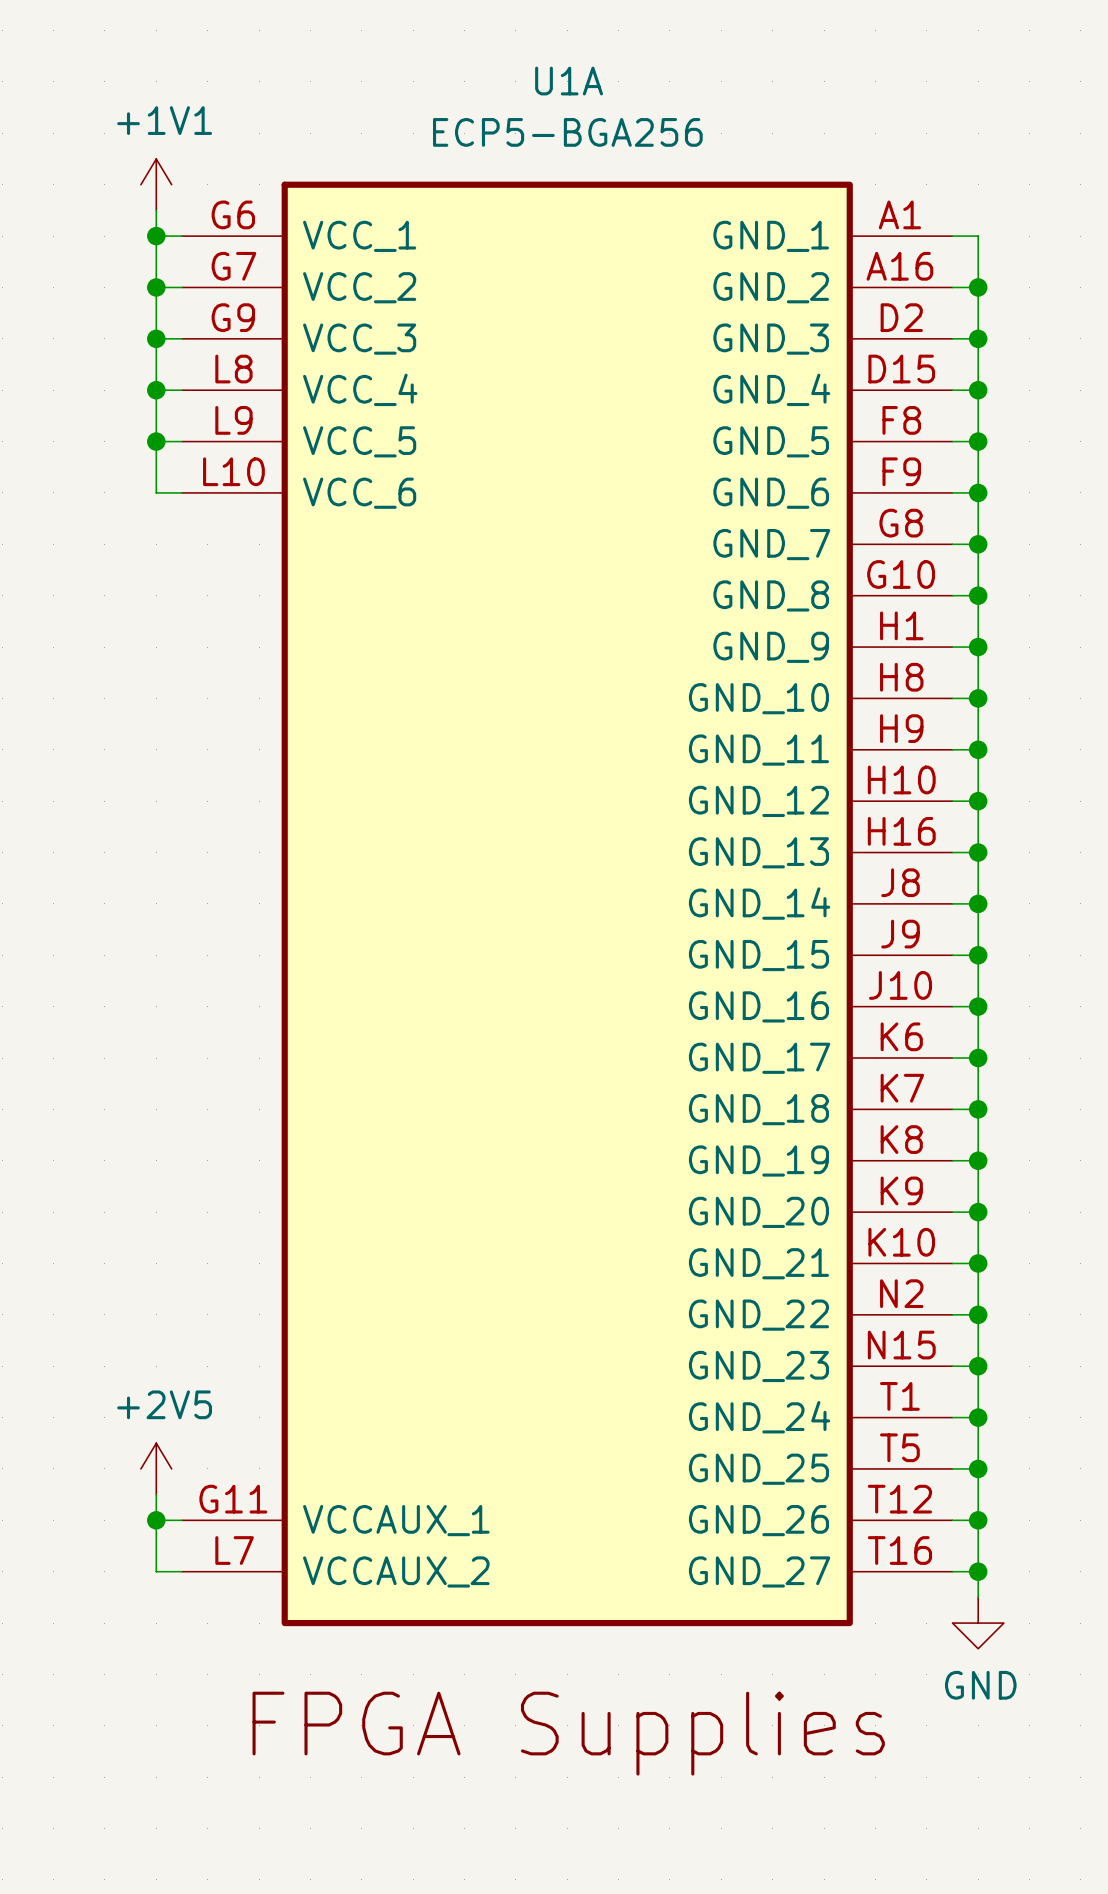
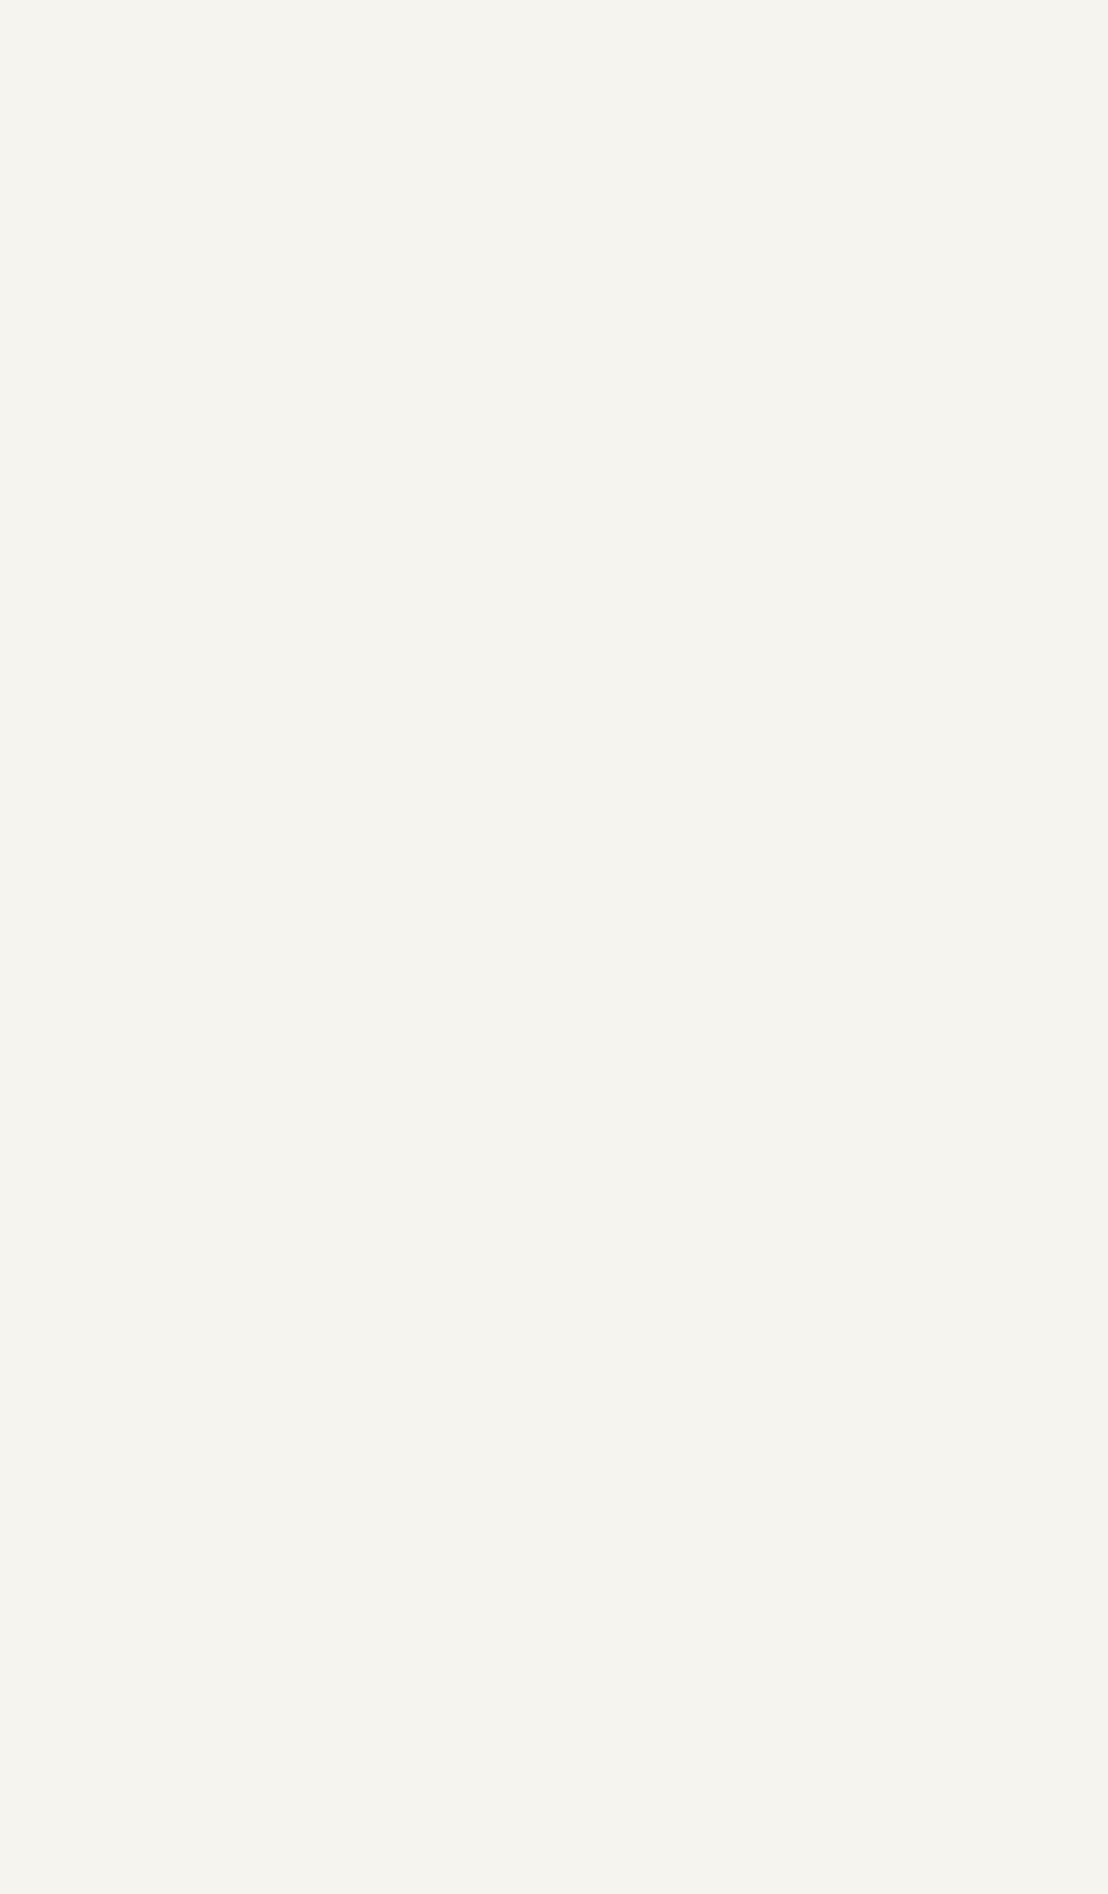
power symbol: +1V1 (156, 184) -> none
wire: (156, 210) (156, 492) (181, 492) -> none
wire: (156, 236) (181, 236) -> none
junction: (156, 236) -> none
wire: (952, 236) (978, 236) (978, 1597) -> none
wire: (156, 287) (181, 287) -> none
junction: (156, 287) -> none
wire: (952, 287) (978, 287) -> none
junction: (978, 287) -> none
wire: (156, 338) (181, 338) -> none
junction: (156, 338) -> none
wire: (952, 338) (978, 338) -> none
junction: (978, 338) -> none
wire: (156, 390) (181, 390) -> none
junction: (156, 390) -> none
wire: (952, 390) (978, 390) -> none
junction: (978, 390) -> none
wire: (156, 441) (181, 441) -> none
junction: (156, 441) -> none
wire: (952, 441) (978, 441) -> none
junction: (978, 441) -> none
wire: (952, 492) (978, 492) -> none
junction: (978, 492) -> none
wire: (952, 544) (978, 544) -> none
junction: (978, 544) -> none
wire: (952, 595) (978, 595) -> none
junction: (978, 595) -> none
wire: (952, 647) (978, 647) -> none
junction: (978, 647) -> none
wire: (952, 698) (978, 698) -> none
junction: (978, 698) -> none
wire: (952, 749) (978, 749) -> none
junction: (978, 749) -> none
wire: (952, 801) (978, 801) -> none
junction: (978, 801) -> none
wire: (952, 852) (978, 852) -> none
junction: (978, 852) -> none
U1A: ECP5-BGA256 (567, 903) -> none
wire: (952, 903) (978, 903) -> none
junction: (978, 903) -> none
wire: (952, 955) (978, 955) -> none
junction: (978, 955) -> none
wire: (952, 1006) (978, 1006) -> none
junction: (978, 1006) -> none
wire: (952, 1058) (978, 1058) -> none
junction: (978, 1058) -> none
wire: (952, 1109) (978, 1109) -> none
junction: (978, 1109) -> none
wire: (952, 1160) (978, 1160) -> none
junction: (978, 1160) -> none
wire: (952, 1212) (978, 1212) -> none
junction: (978, 1212) -> none
wire: (952, 1263) (978, 1263) -> none
junction: (978, 1263) -> none
wire: (952, 1314) (978, 1314) -> none
junction: (978, 1314) -> none
wire: (952, 1366) (978, 1366) -> none
junction: (978, 1366) -> none
wire: (952, 1417) (978, 1417) -> none
junction: (978, 1417) -> none
power symbol: +2V5 (156, 1468) -> none
wire: (952, 1468) (978, 1468) -> none
junction: (978, 1468) -> none
wire: (156, 1494) (156, 1571) (181, 1571) -> none
wire: (156, 1520) (181, 1520) -> none
junction: (156, 1520) -> none
wire: (952, 1520) (978, 1520) -> none
junction: (978, 1520) -> none
wire: (952, 1571) (978, 1571) -> none
junction: (978, 1571) -> none
power symbol: GND (978, 1623) -> none

